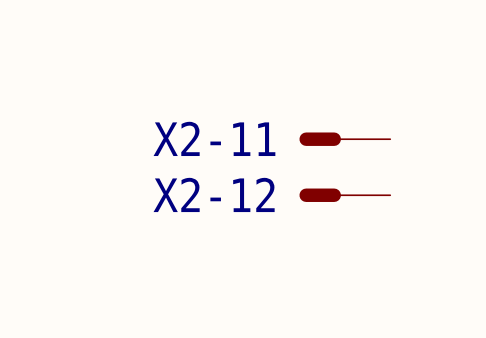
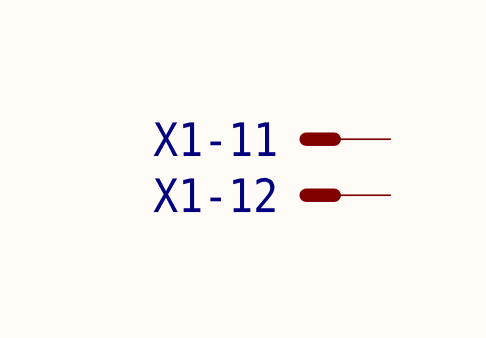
X2-11 name: X2-11 (214, 138) -> X1-11 (214, 139)
X2-12 name: X2-12 (214, 194) -> X1-12 (214, 194)

